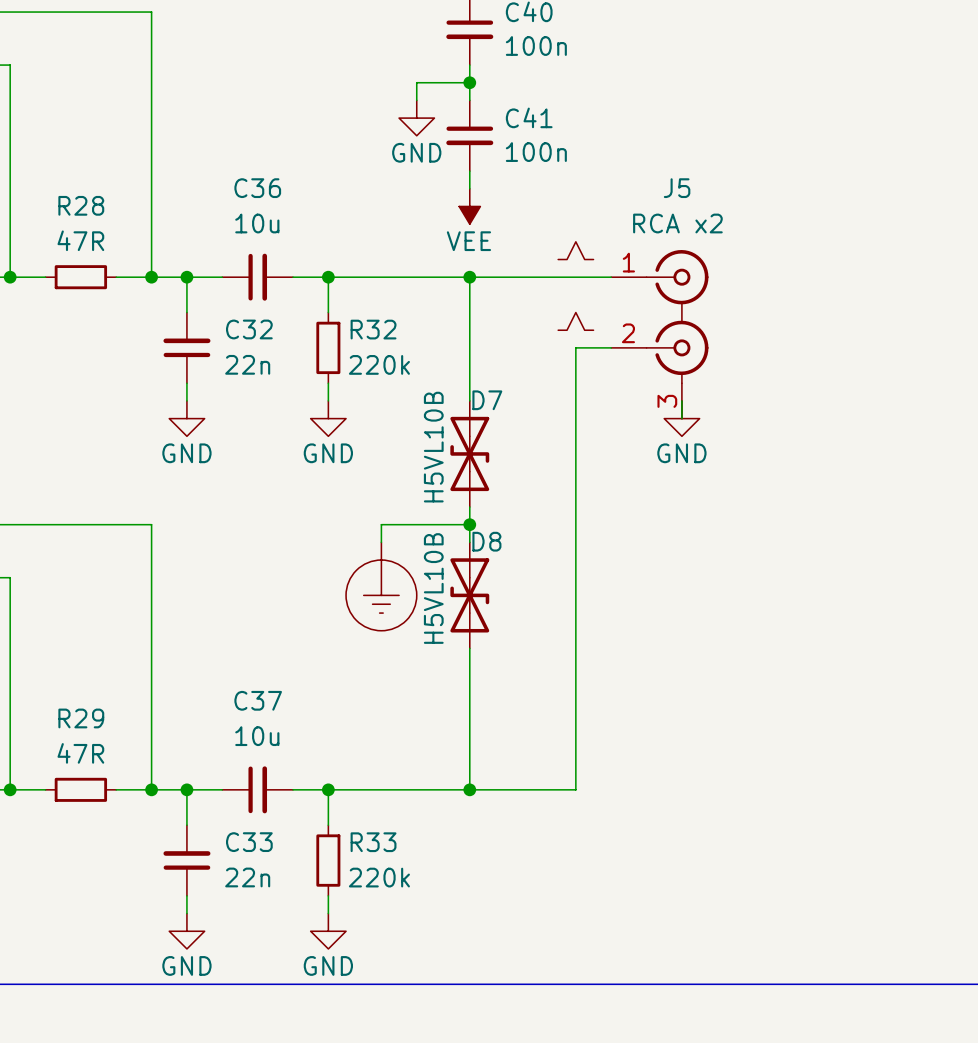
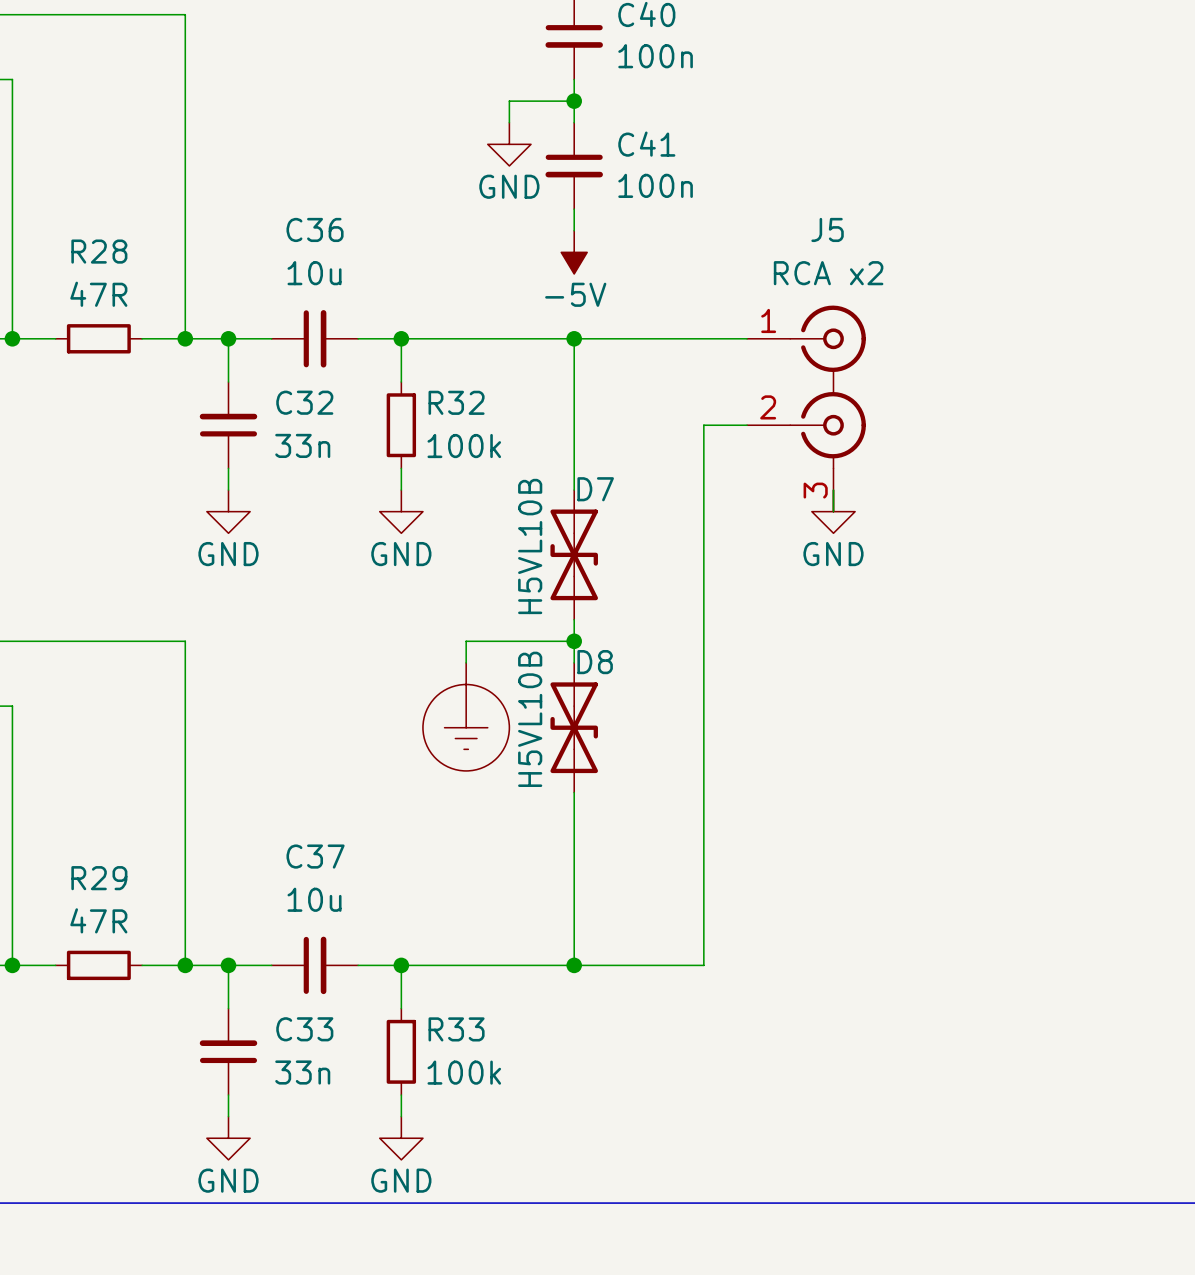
power symbol: VEE (469, 206) -> -5V (574, 252)
part: (575, 250) -> none
part: (575, 321) -> none
C32 value: 22n (247, 364) -> 33n (302, 445)
R32 value: 220k (379, 364) -> 100k (464, 446)
C33 value: 22n (247, 877) -> 33n (302, 1072)
R33 value: 220k (379, 877) -> 100k (464, 1072)

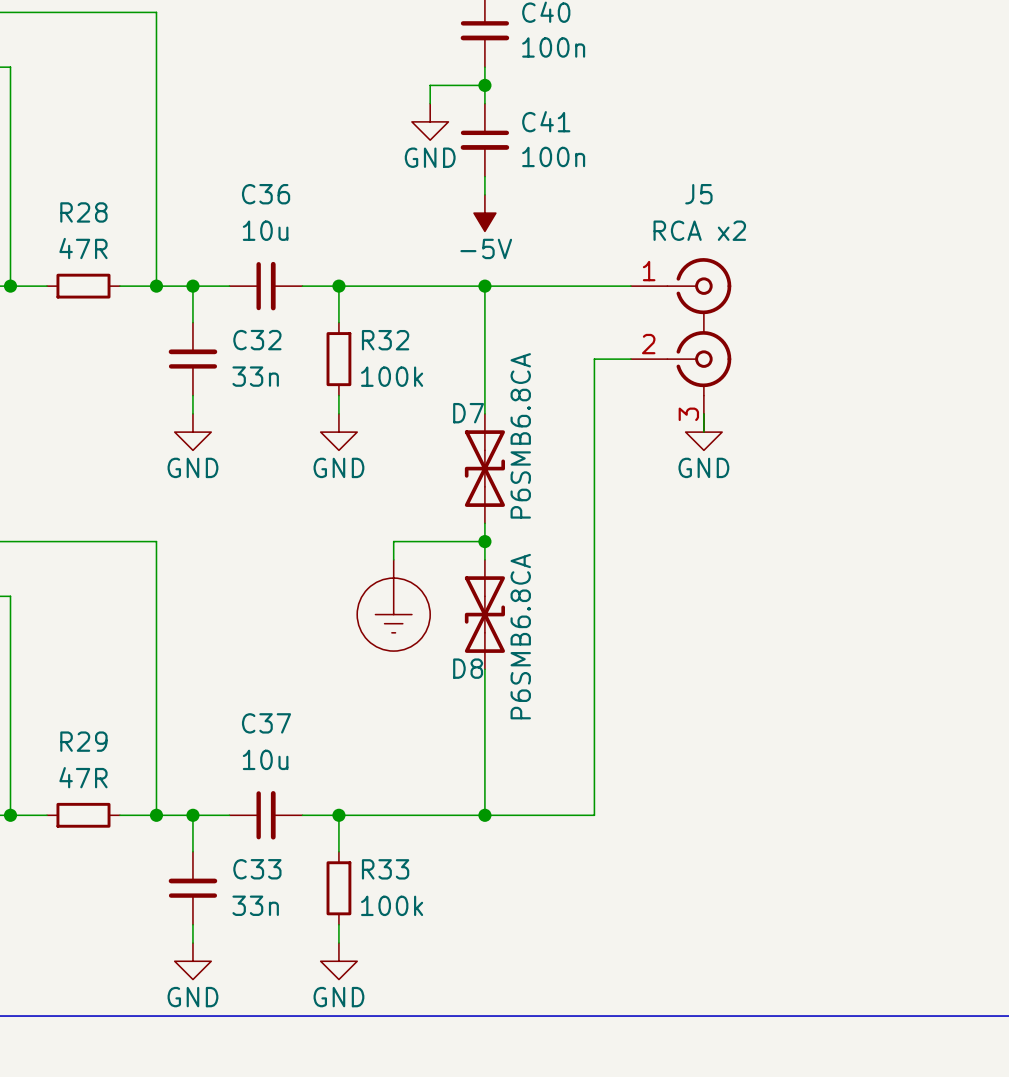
D7 value: H5VL10B (530, 546) -> P6SMB6.8CA (520, 435)
D7 flip: as is (574, 554) -> left-right (484, 468)
D8 name position: D8 (595, 662) -> D8 (468, 668)
D8 value: H5VL10B (530, 719) -> P6SMB6.8CA (520, 636)
D8 flip: as is (574, 727) -> left-right (484, 614)

